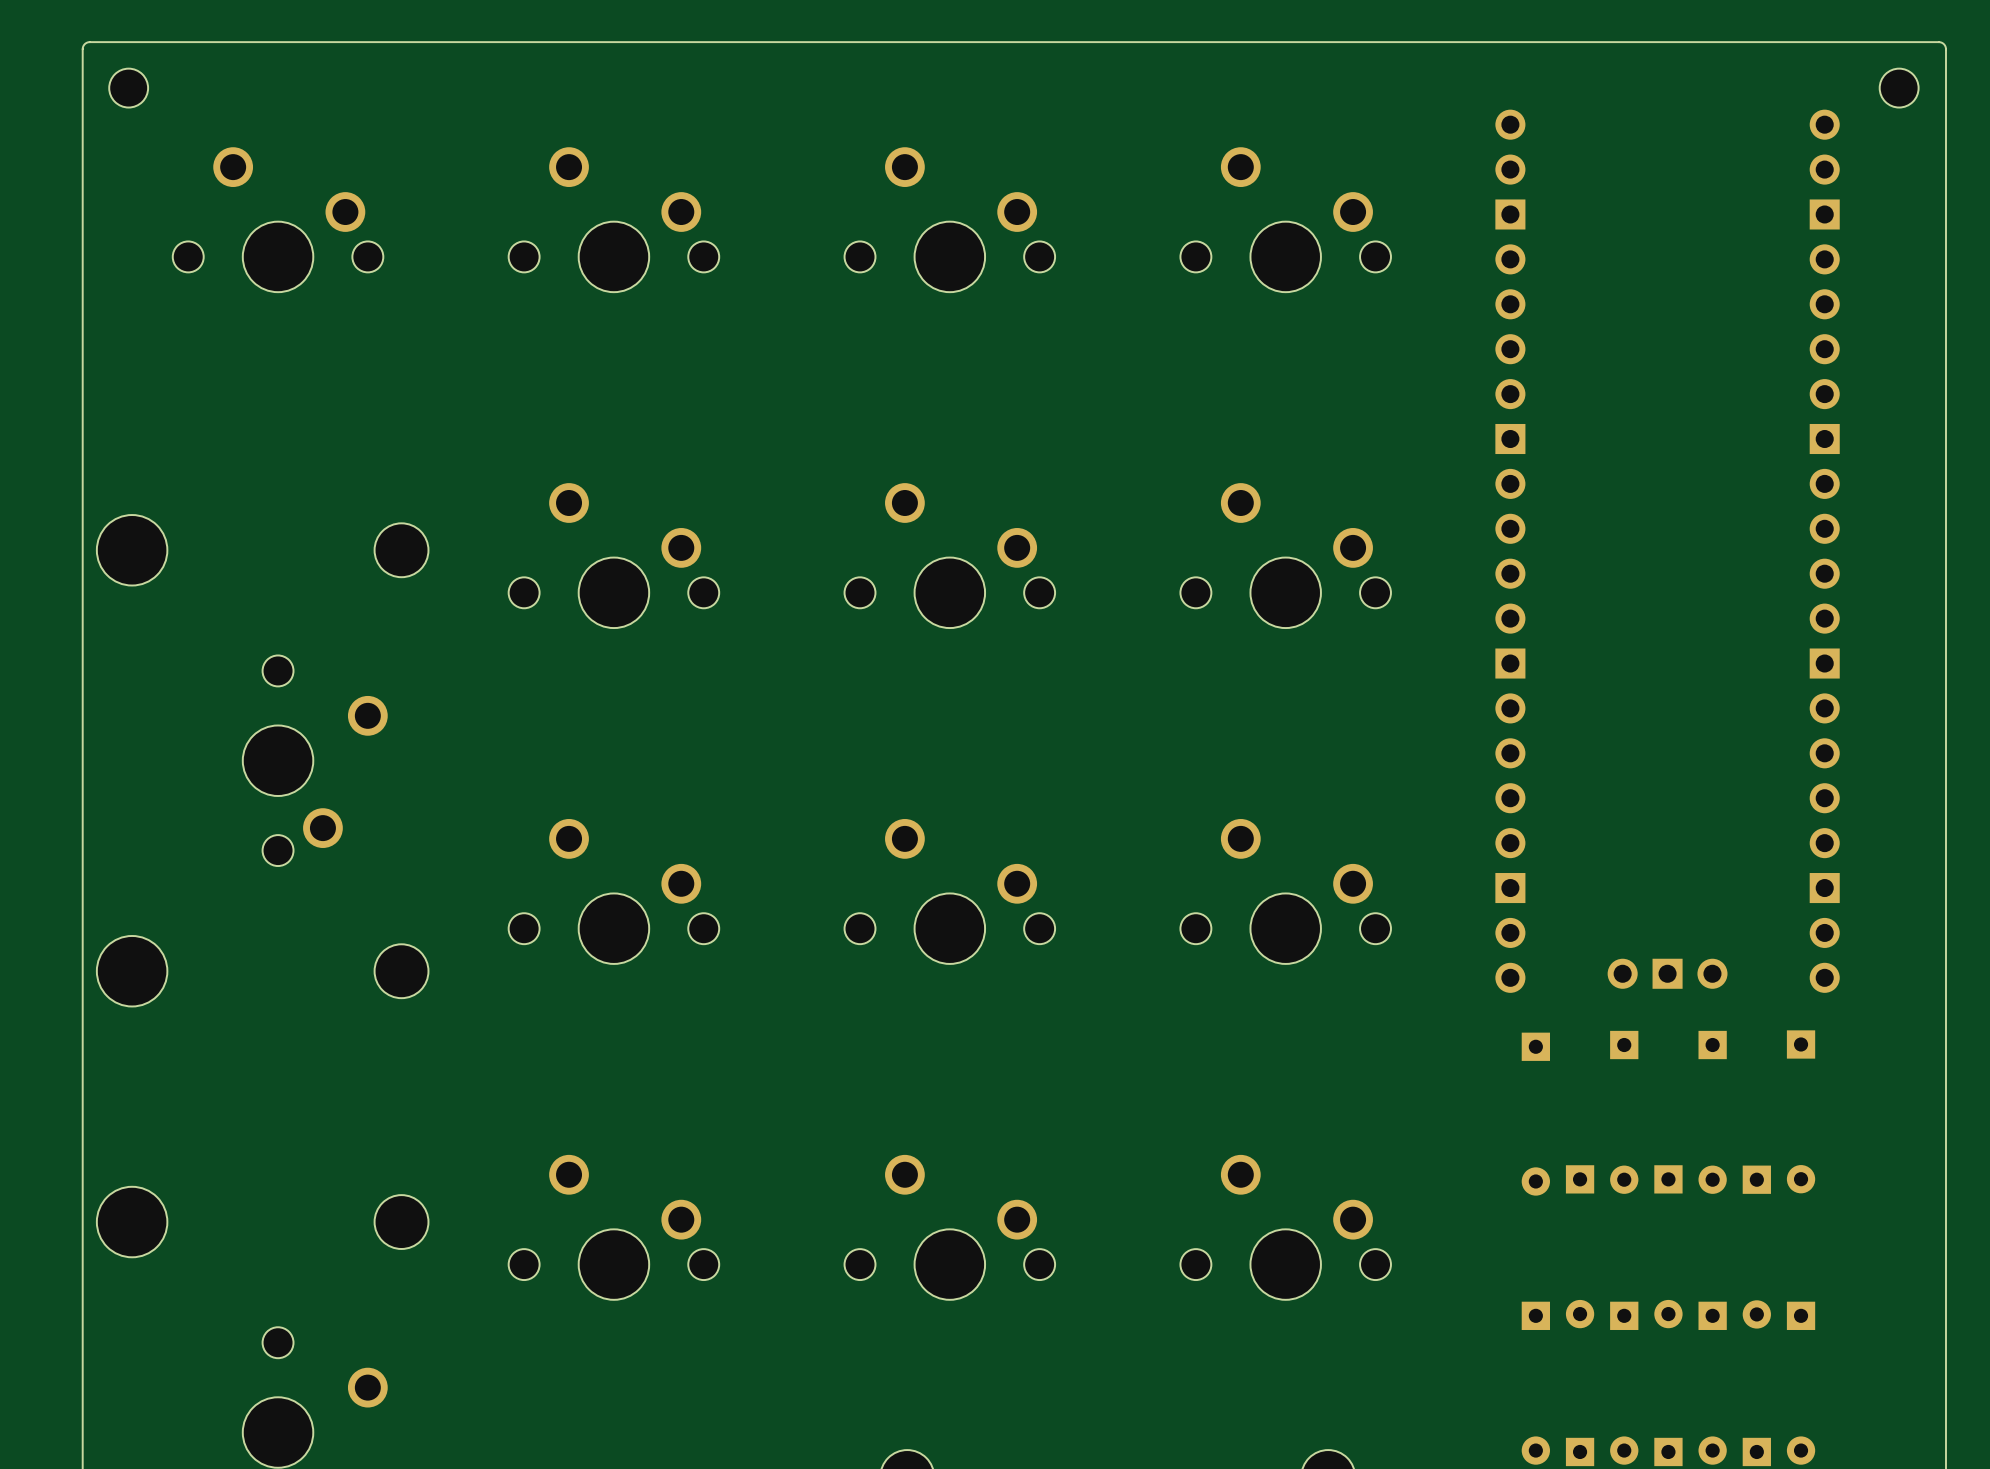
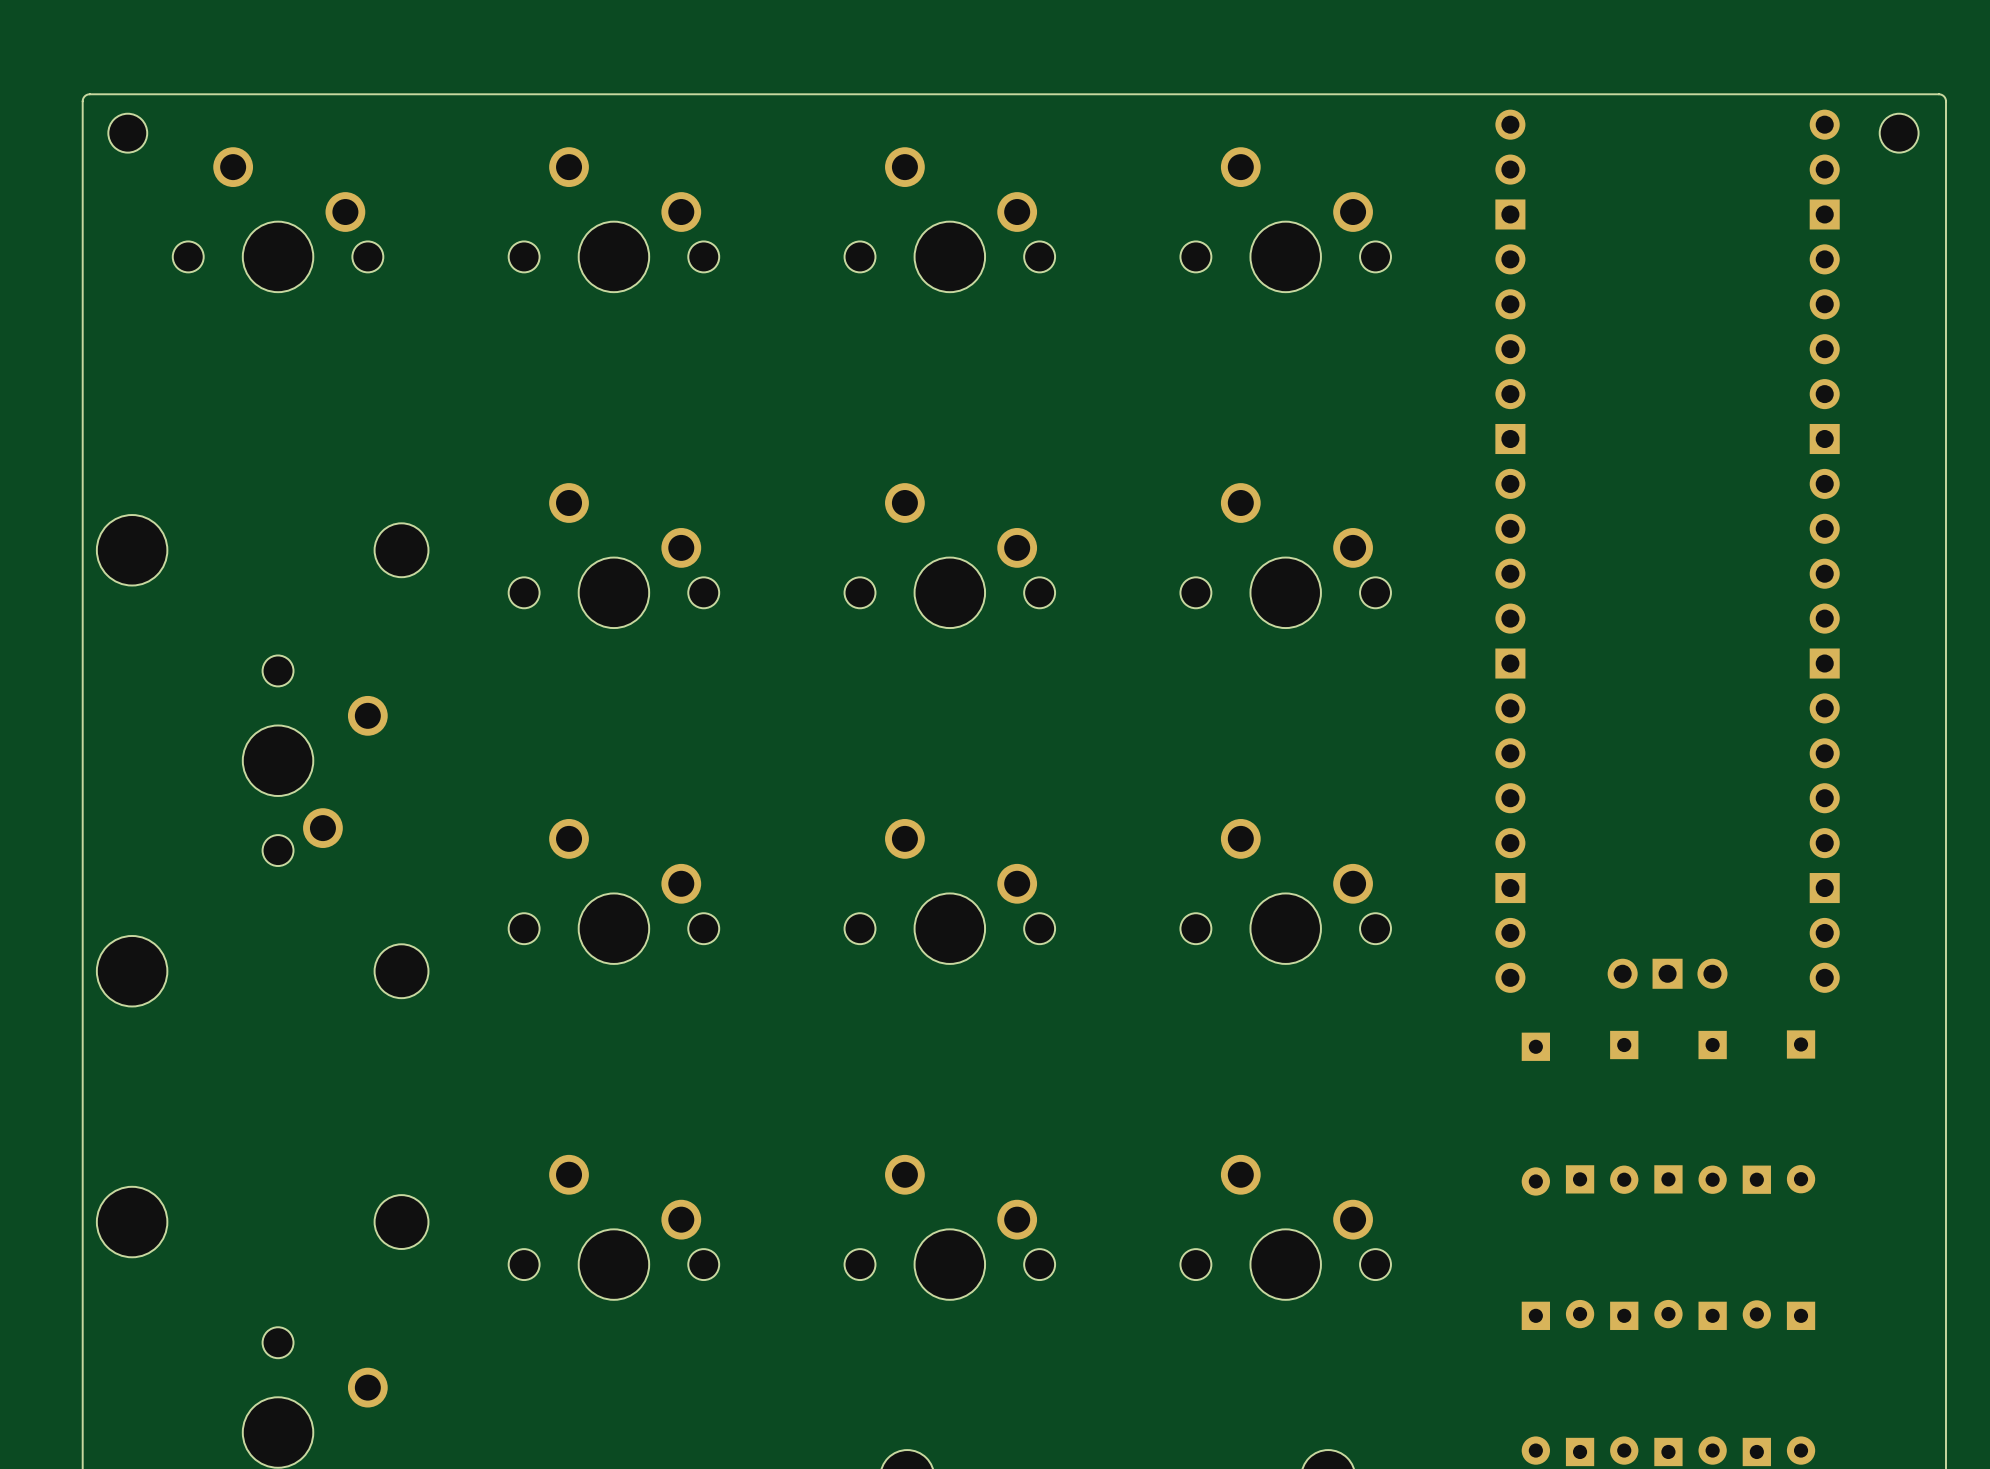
part position: (128, 88) -> (127, 133)
part position: (1899, 88) -> (1899, 133)
board edge: (1945, 101) (1945, 48) (1943, 44) (1938, 42) (89, 42) (84, 44) (82, 48) (82, 101) -> (1945, 101) (1943, 96) (1938, 94) (89, 94) (84, 96) (82, 101)

